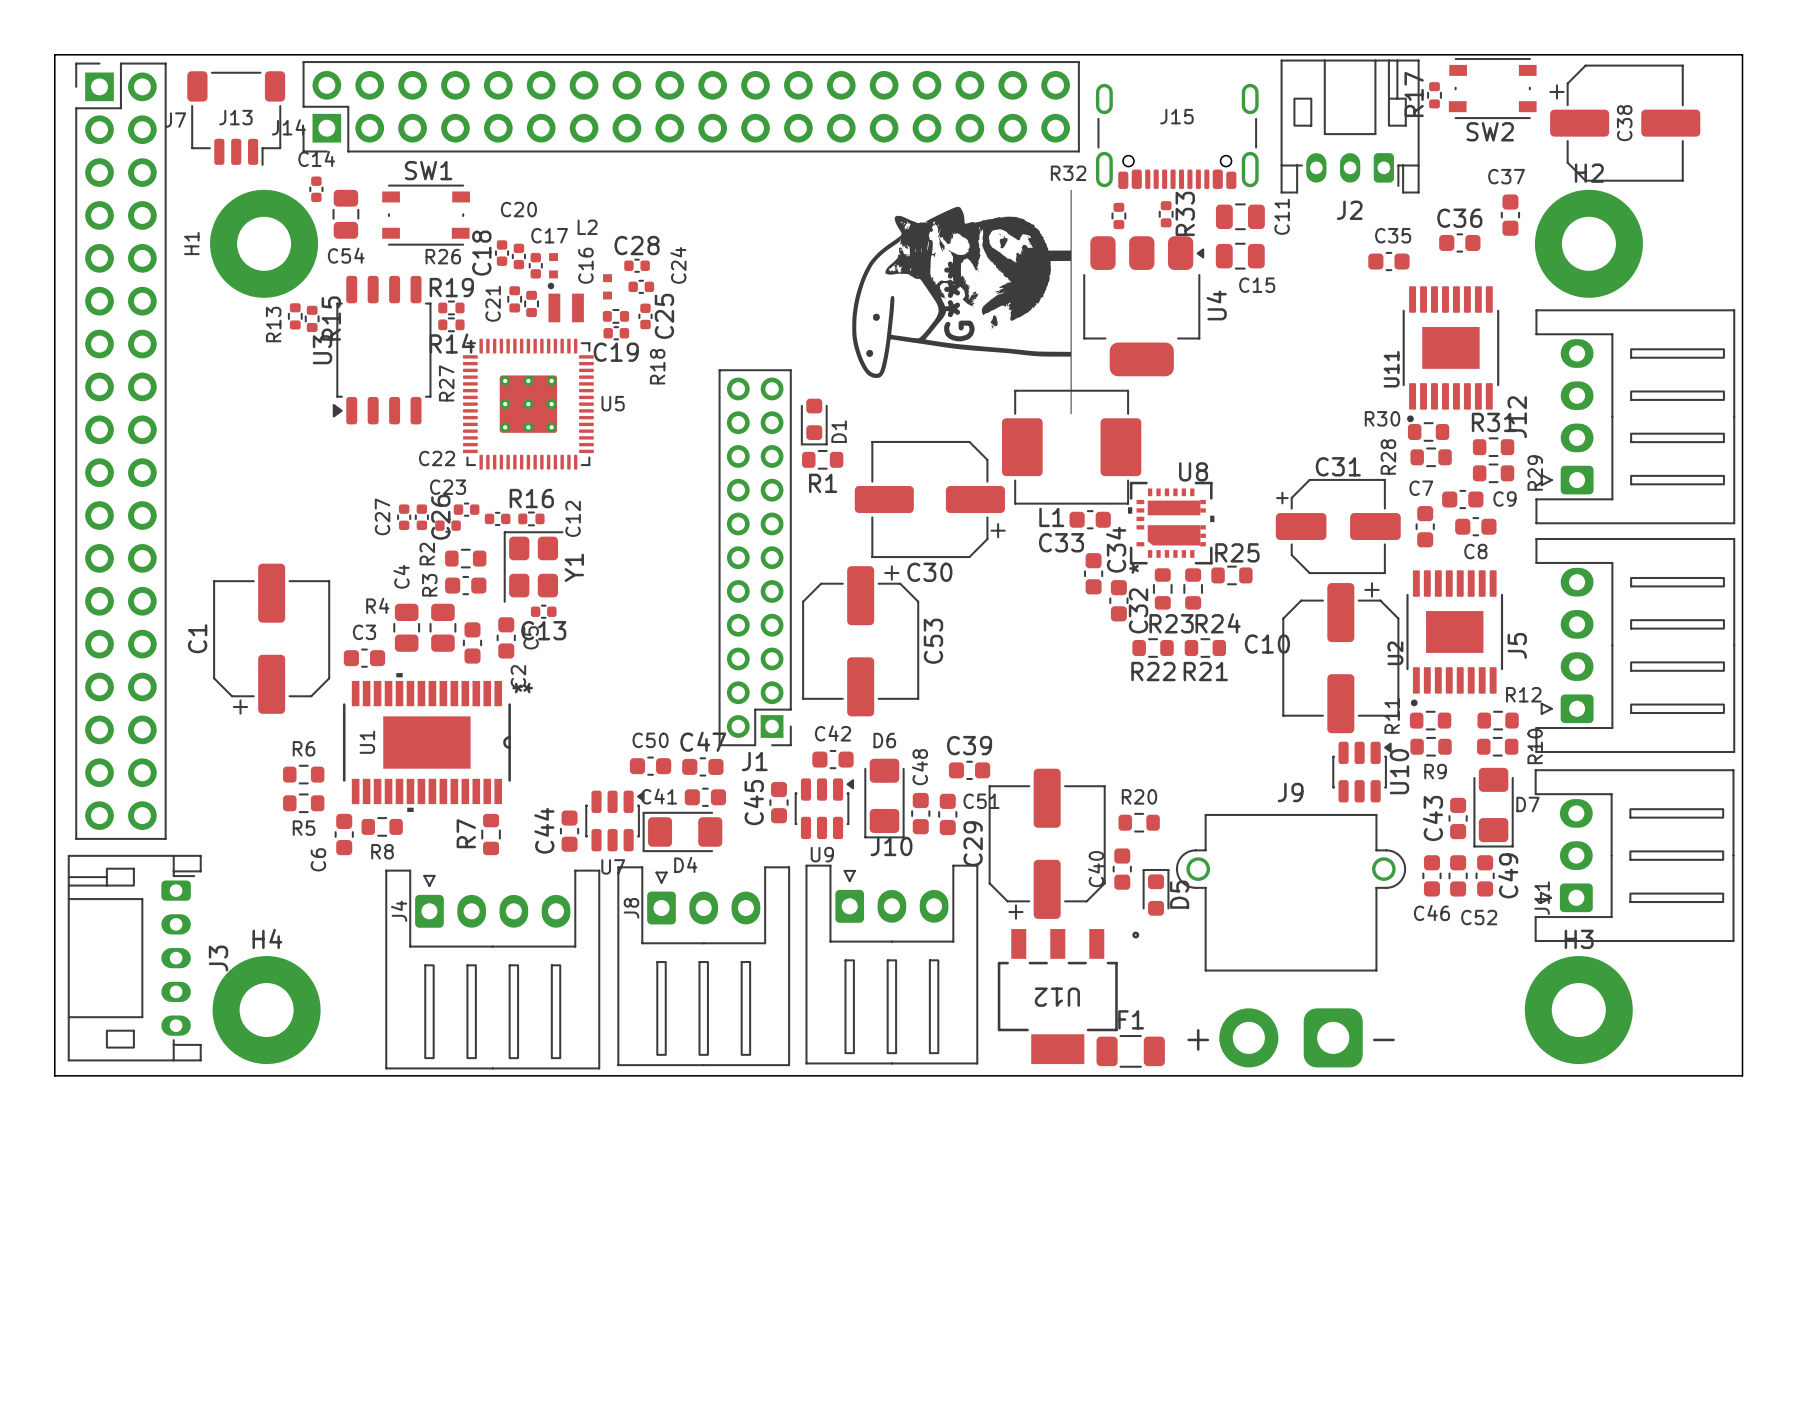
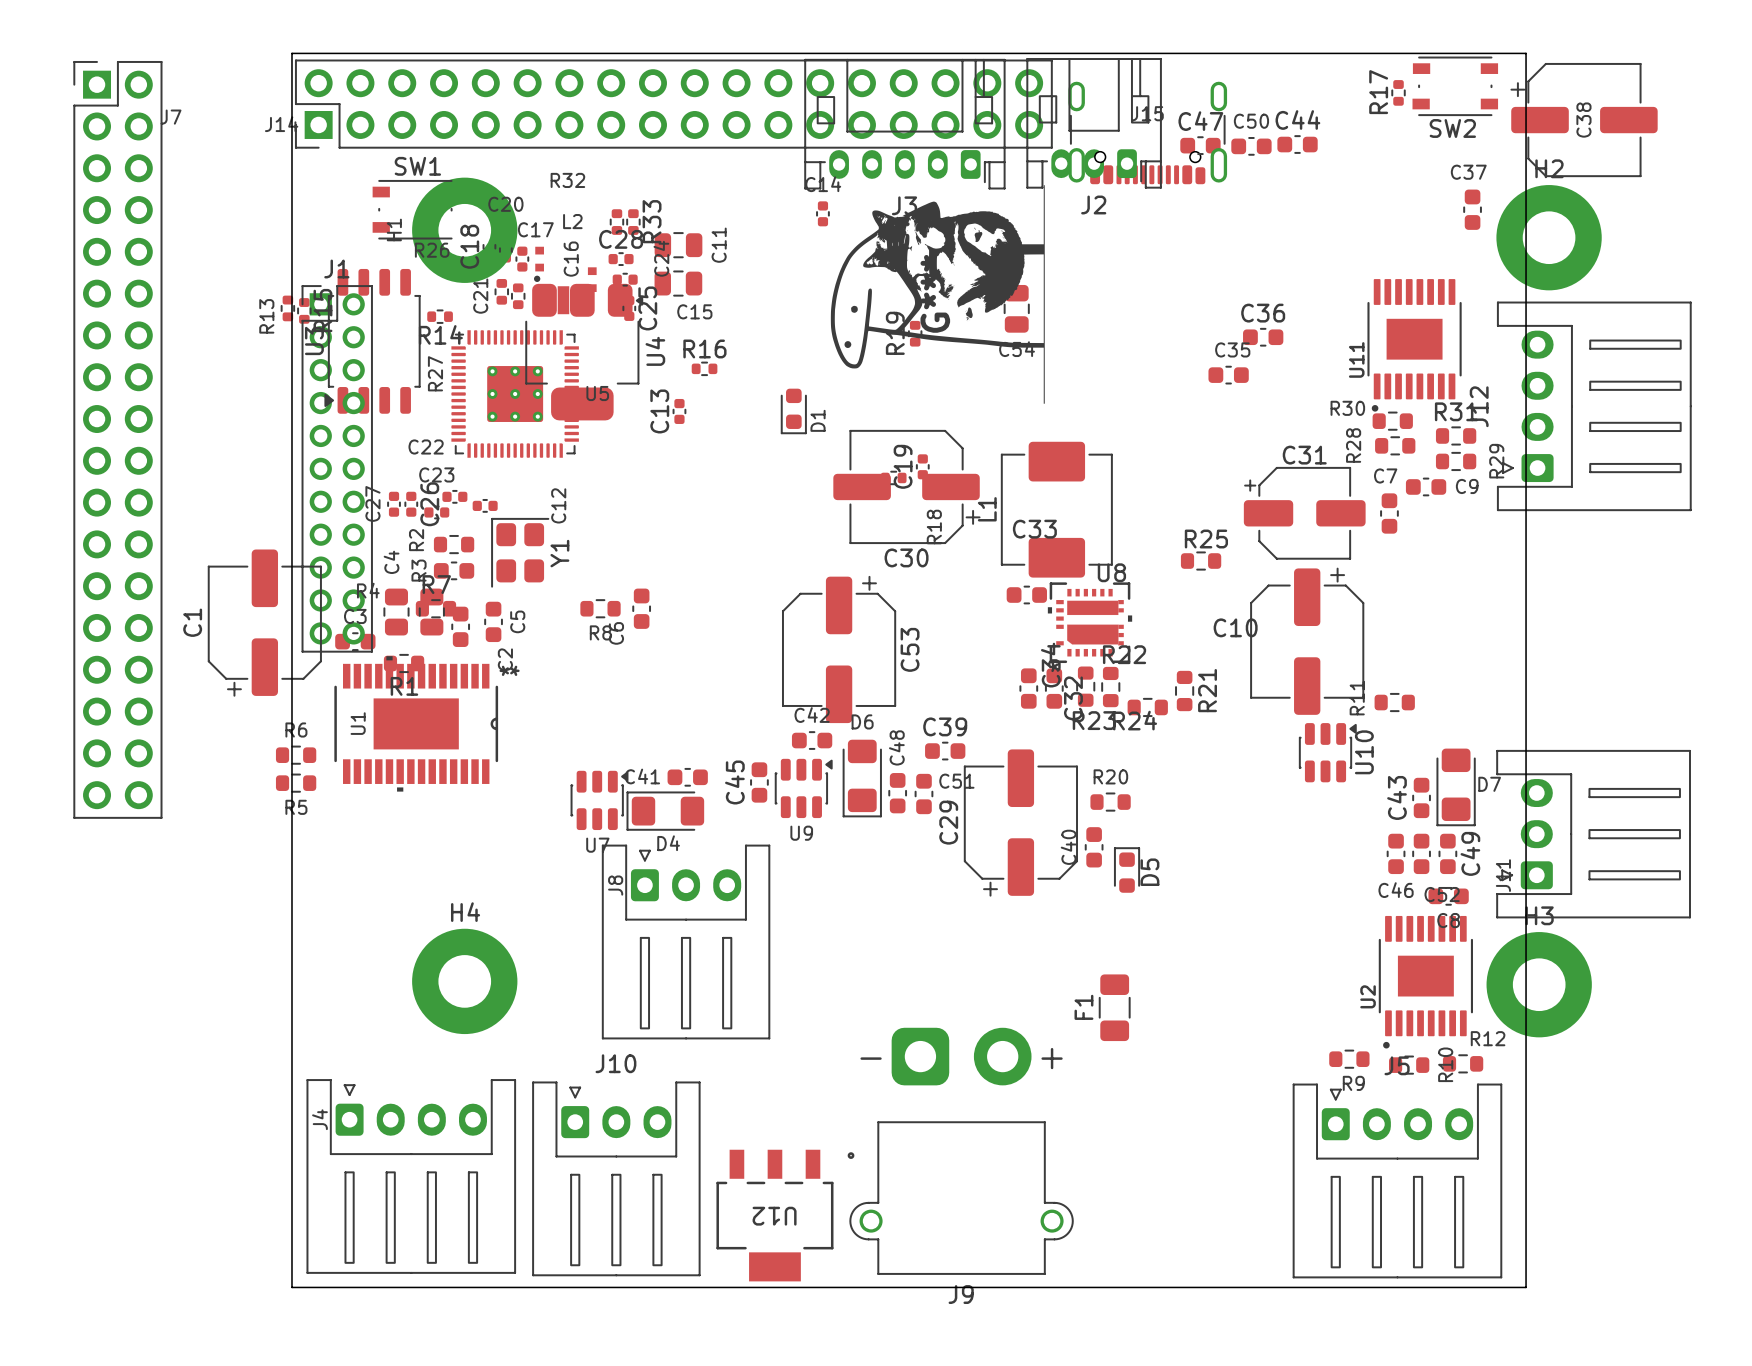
board edge: (299, 54) (54, 54) (54, 1075) (1742, 1075) (1742, 54) (1565, 54) -> (291, 53) (291, 1287) (1526, 1287) (1526, 53)
J13: (236, 118) -> none
J2 position: (1350, 126) -> (1094, 123)
C14 position: (316, 189) -> (822, 213)
C54 position: (345, 214) -> (1016, 308)
R33 position: (1166, 214) -> (633, 222)
R32 position: (1118, 215) -> (616, 222)
C11 position: (1240, 216) -> (678, 245)
C36 position: (1459, 242) -> (1263, 337)
H1 position: (264, 243) -> (464, 230)
C15 position: (1240, 256) -> (678, 283)
C35 position: (1388, 261) -> (1228, 375)
U4 position: (1143, 306) -> (584, 352)
R19 rotation: 0° (451, 307) -> 90° clockwise (915, 333)
R19 position: (451, 307) -> (915, 333)
R18 position: (615, 316) -> (893, 477)
C19 rotation: 0° (616, 333) -> 90° clockwise (922, 466)
C19 position: (616, 333) -> (922, 466)
L1 rotation: 0° (1071, 447) -> 90° clockwise (1056, 509)
R1 position: (822, 459) -> (404, 663)
R16 position: (531, 518) -> (704, 368)
C33 position: (1090, 519) -> (1026, 595)
U8 position: (1171, 523) -> (1090, 622)
C8 position: (1475, 526) -> (1448, 896)
J1 rotation: 0° (755, 557) -> 180° (337, 468)
J1 position: (755, 557) -> (337, 468)
C34 position: (1093, 573) -> (1028, 688)
R23 position: (1162, 588) -> (1085, 686)
R24 position: (1193, 588) -> (1110, 687)
C32 position: (1118, 600) -> (1054, 688)
C13 rotation: 0° (543, 611) -> 90° clockwise (679, 411)
C13 position: (543, 611) -> (679, 411)
U2 position: (1454, 638) -> (1425, 982)
C53 position: (860, 640) -> (839, 649)
J5 rotation: 0° (1635, 645) -> 90° clockwise (1397, 1180)
J5 position: (1635, 645) -> (1397, 1180)
R22 position: (1153, 648) -> (1147, 707)
R21 rotation: 0° (1205, 648) -> 90° clockwise (1184, 691)
R21 position: (1205, 648) -> (1184, 691)
R21 name position: R21 (1205, 671) -> R21 (1207, 690)
R12 position: (1498, 720) -> (1463, 1063)
R9 position: (1431, 746) -> (1349, 1059)
R10 position: (1497, 746) -> (1409, 1065)
C50 position: (650, 766) -> (1251, 146)
C47 position: (702, 766) -> (1200, 145)
R8 position: (382, 826) -> (600, 608)
C44 rotation: 0° (569, 831) -> 90° clockwise (1297, 144)
C44 position: (569, 831) -> (1297, 144)
C6 position: (344, 834) -> (641, 608)
R7 rotation: 0° (491, 834) -> 90° clockwise (435, 608)
R7 position: (491, 834) -> (435, 608)
J9 rotation: 0° (1291, 940) -> 180° (961, 1151)
J9 position: (1291, 940) -> (961, 1151)
J3 rotation: 0° (134, 958) -> 90° clockwise (904, 124)
J3 position: (134, 958) -> (904, 124)
J10 position: (891, 964) -> (616, 1178)
J4 position: (492, 969) -> (411, 1176)
U12 position: (1068, 996) -> (785, 1215)
H4 position: (266, 1010) -> (464, 981)
F1 name position: F1 (1131, 1019) -> F1 (1083, 1007)
F1 rotation: 0° (1130, 1051) -> 90° clockwise (1114, 1007)

